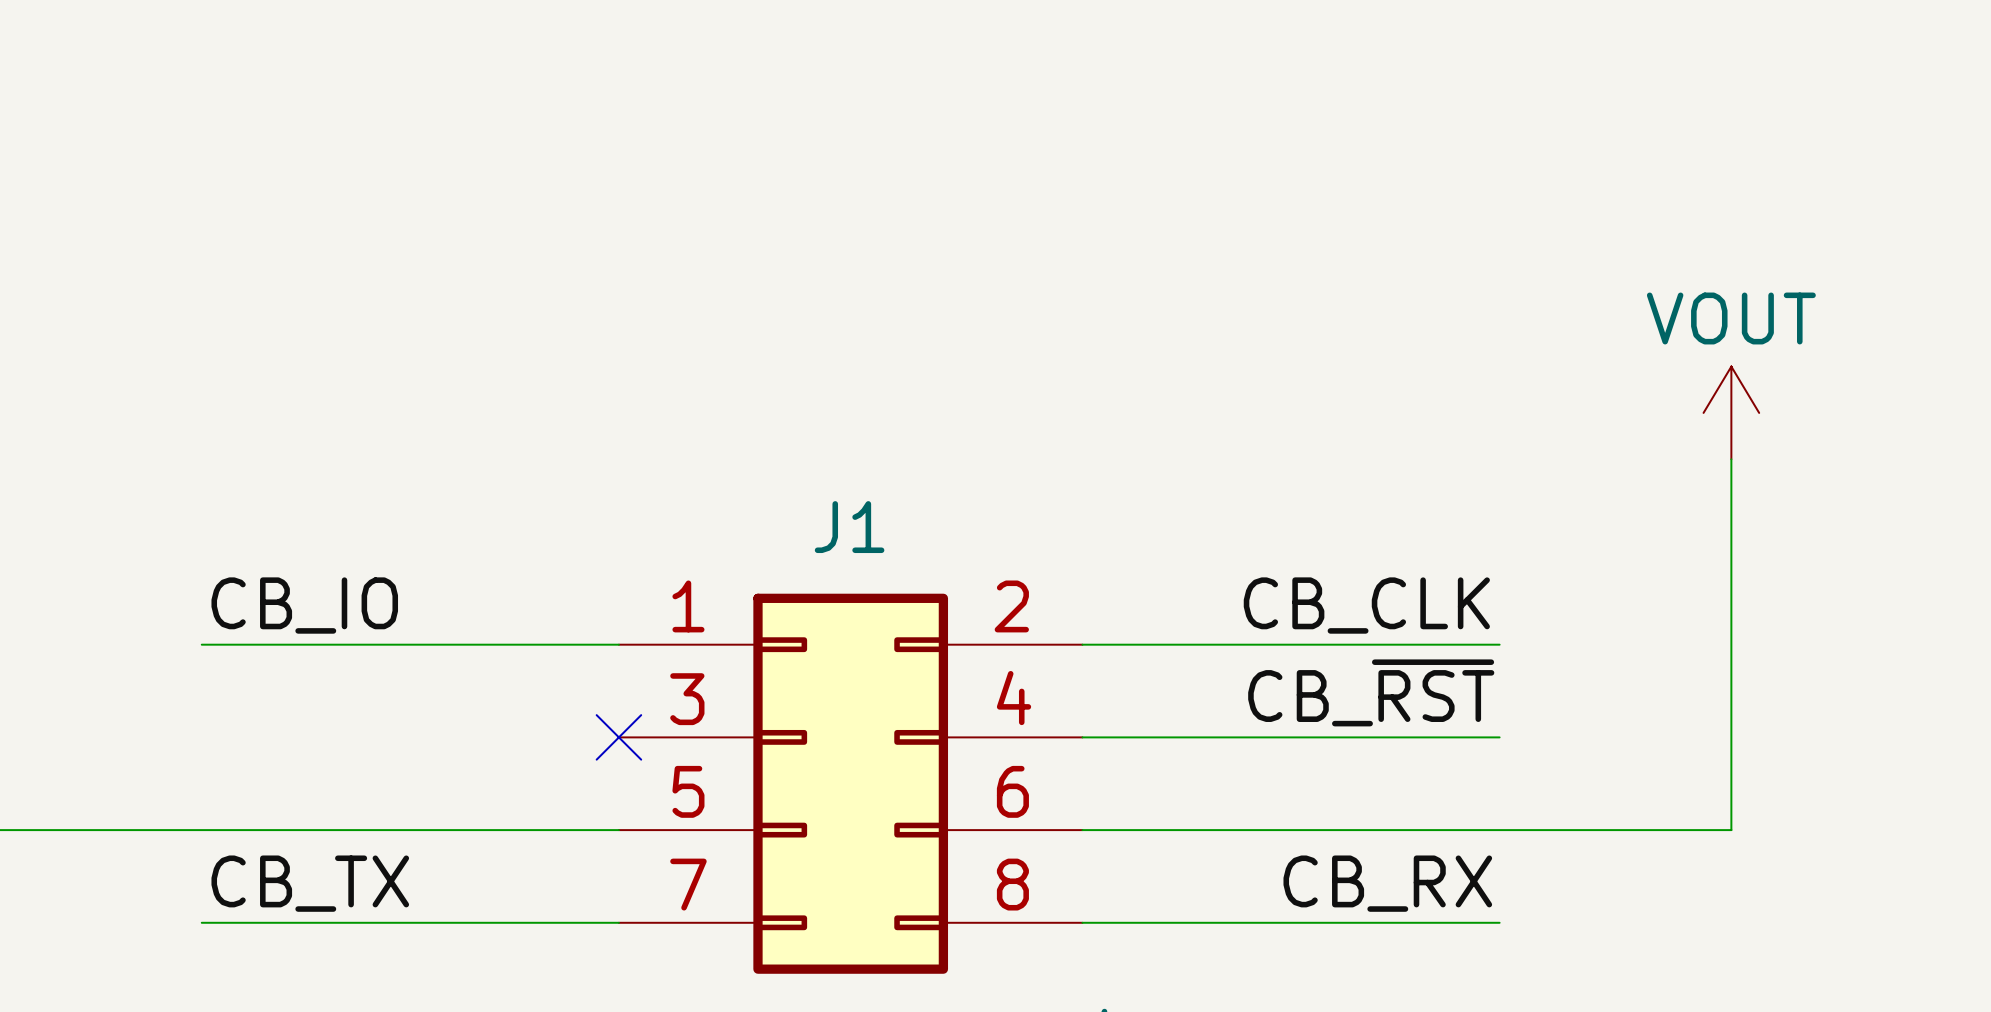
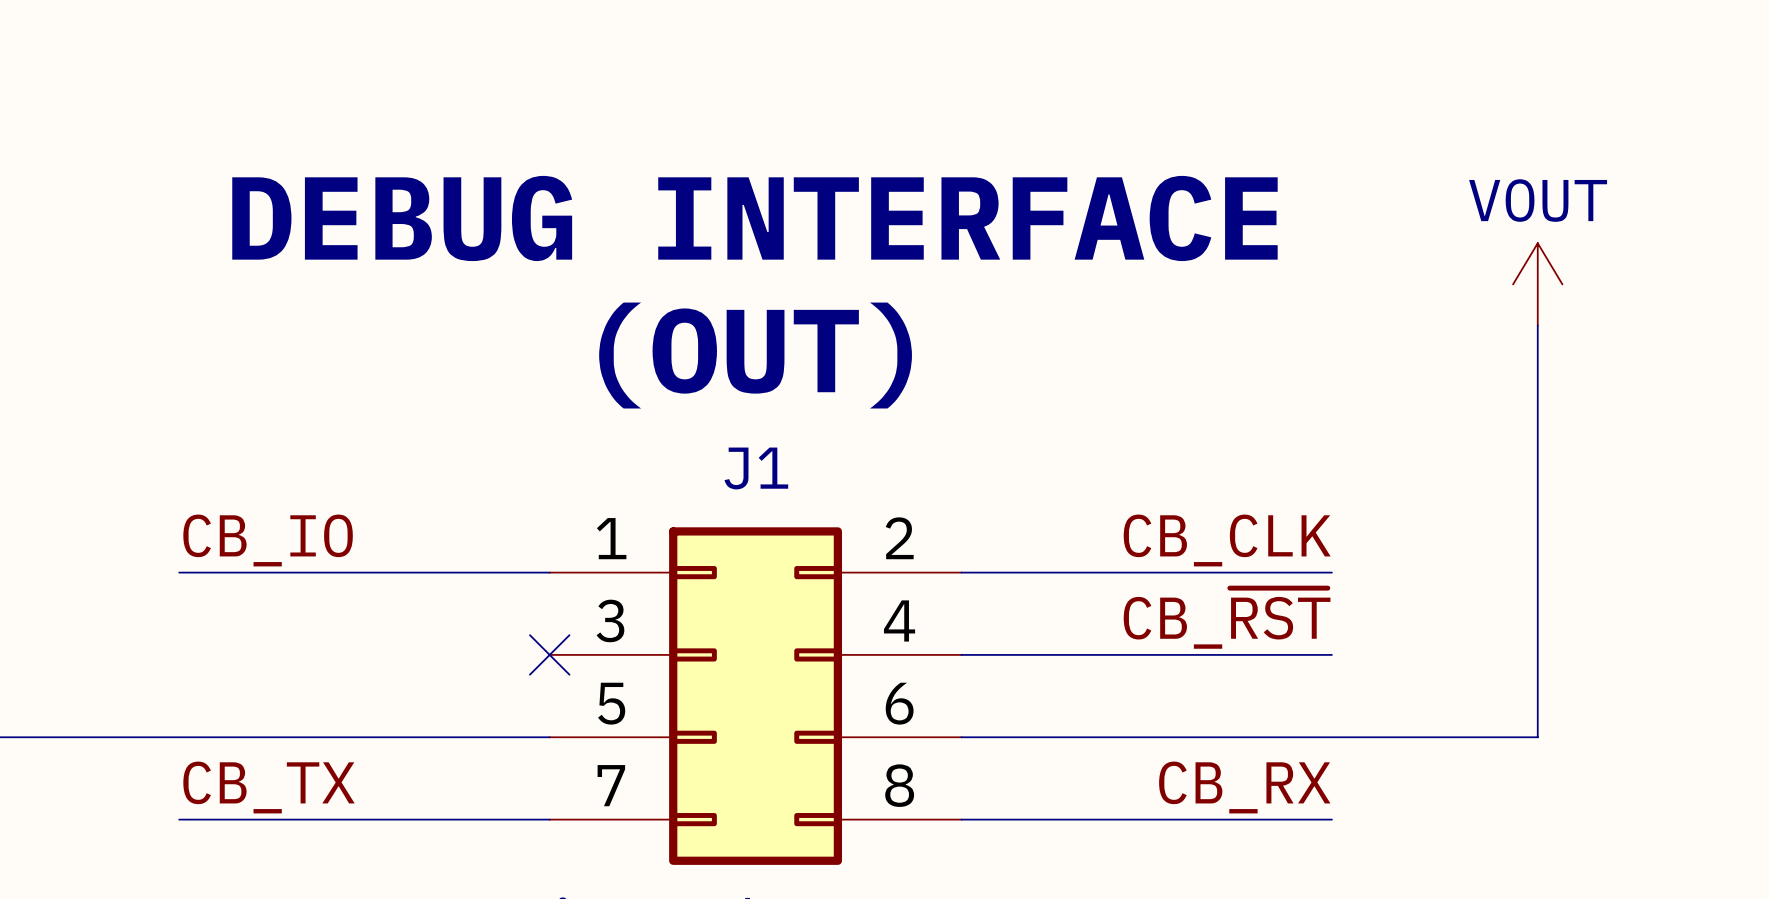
text: none -> DEBUG INTERFACE (754, 218)
text: none -> (OUT) (755, 355)
power symbol position: VOUT (1731, 412) -> VOUT (1537, 284)

